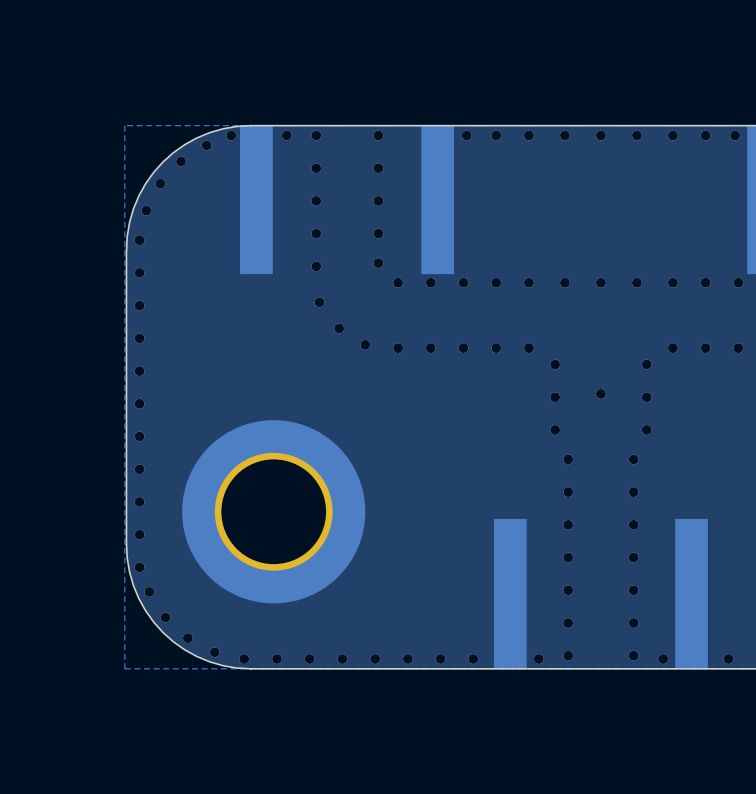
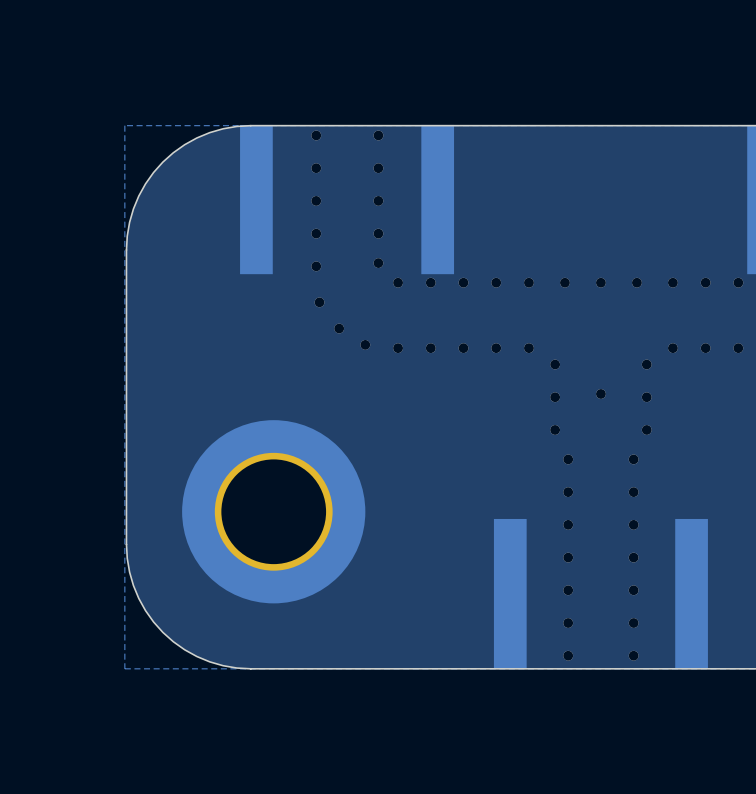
via: (231, 135) -> none
via: (286, 135) -> none
via: (466, 135) -> none
via: (496, 135) -> none
via: (528, 135) -> none
via: (564, 135) -> none
via: (600, 135) -> none
via: (636, 135) -> none
via: (672, 135) -> none
via: (705, 135) -> none
via: (735, 135) -> none
via: (206, 145) -> none
via: (181, 161) -> none
via: (160, 183) -> none
via: (146, 210) -> none
via: (139, 240) -> none
via: (139, 272) -> none
via: (139, 305) -> none
via: (139, 338) -> none
via: (139, 371) -> none
via: (139, 403) -> none
via: (139, 436) -> none
via: (139, 469) -> none
via: (139, 501) -> none
via: (139, 534) -> none
via: (139, 567) -> none
via: (149, 591) -> none
via: (165, 617) -> none
via: (187, 638) -> none
via: (214, 652) -> none
via: (244, 659) -> none
via: (276, 659) -> none
via: (309, 659) -> none
via: (342, 659) -> none
via: (375, 659) -> none
via: (407, 659) -> none
via: (440, 659) -> none
via: (473, 659) -> none
via: (538, 659) -> none
via: (663, 659) -> none
via: (728, 659) -> none

